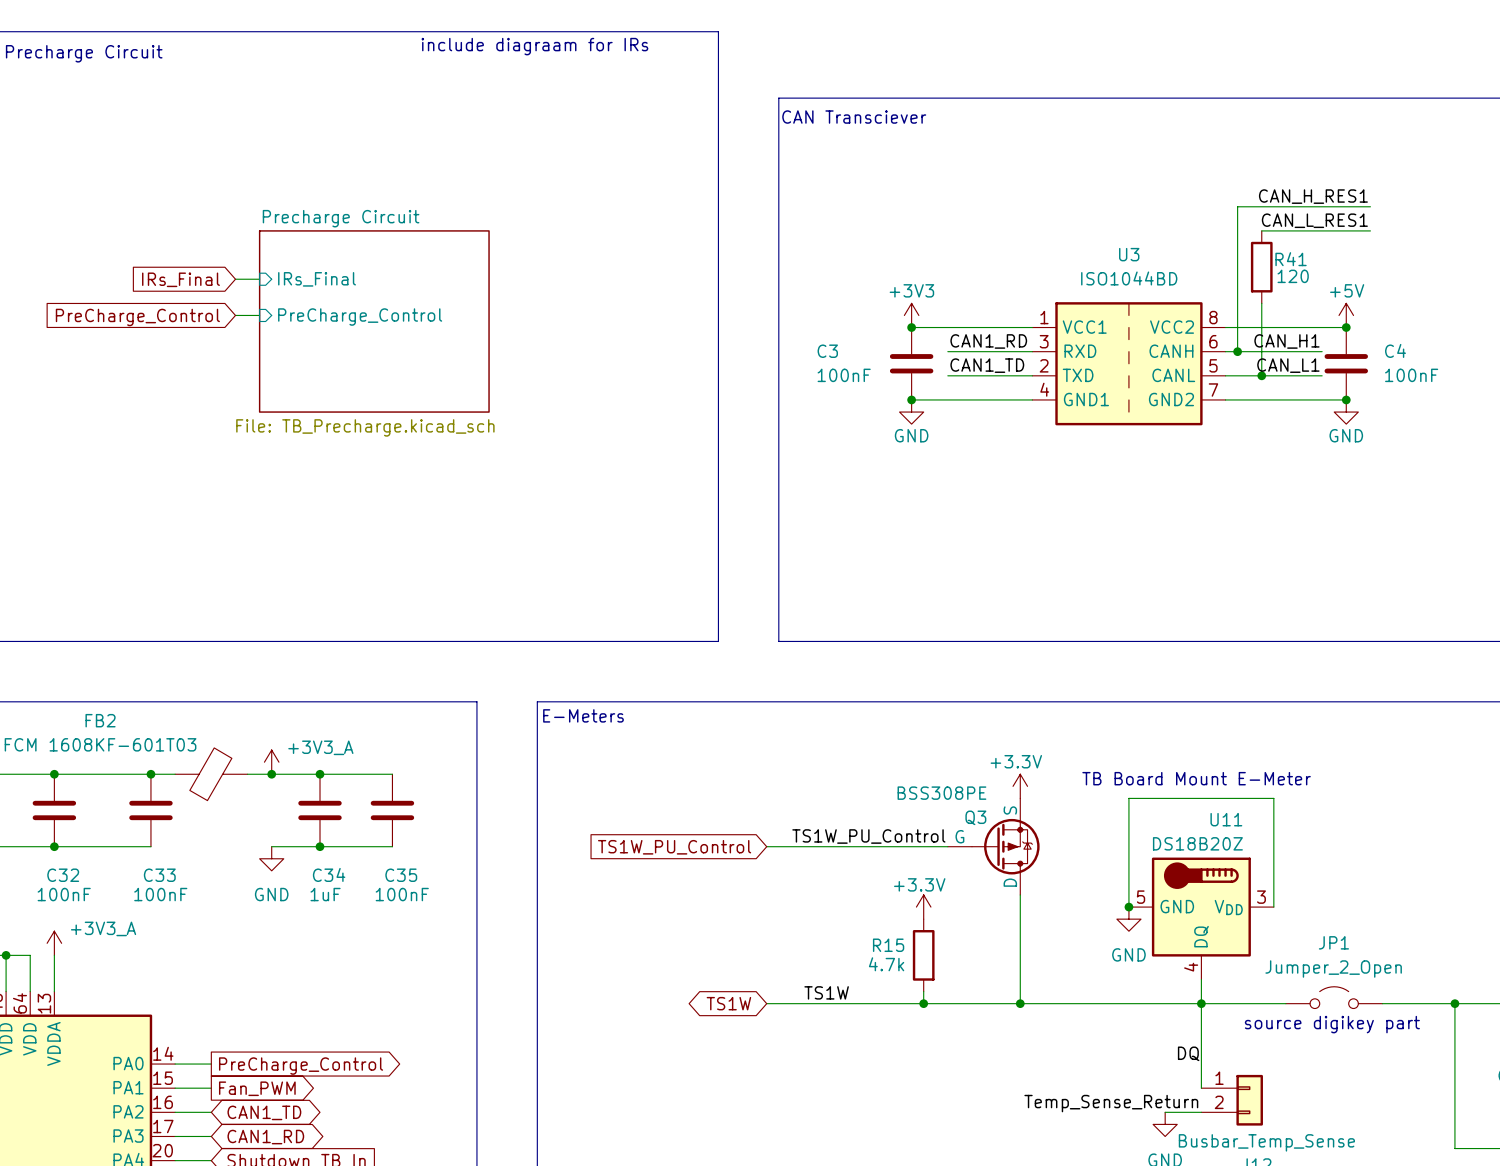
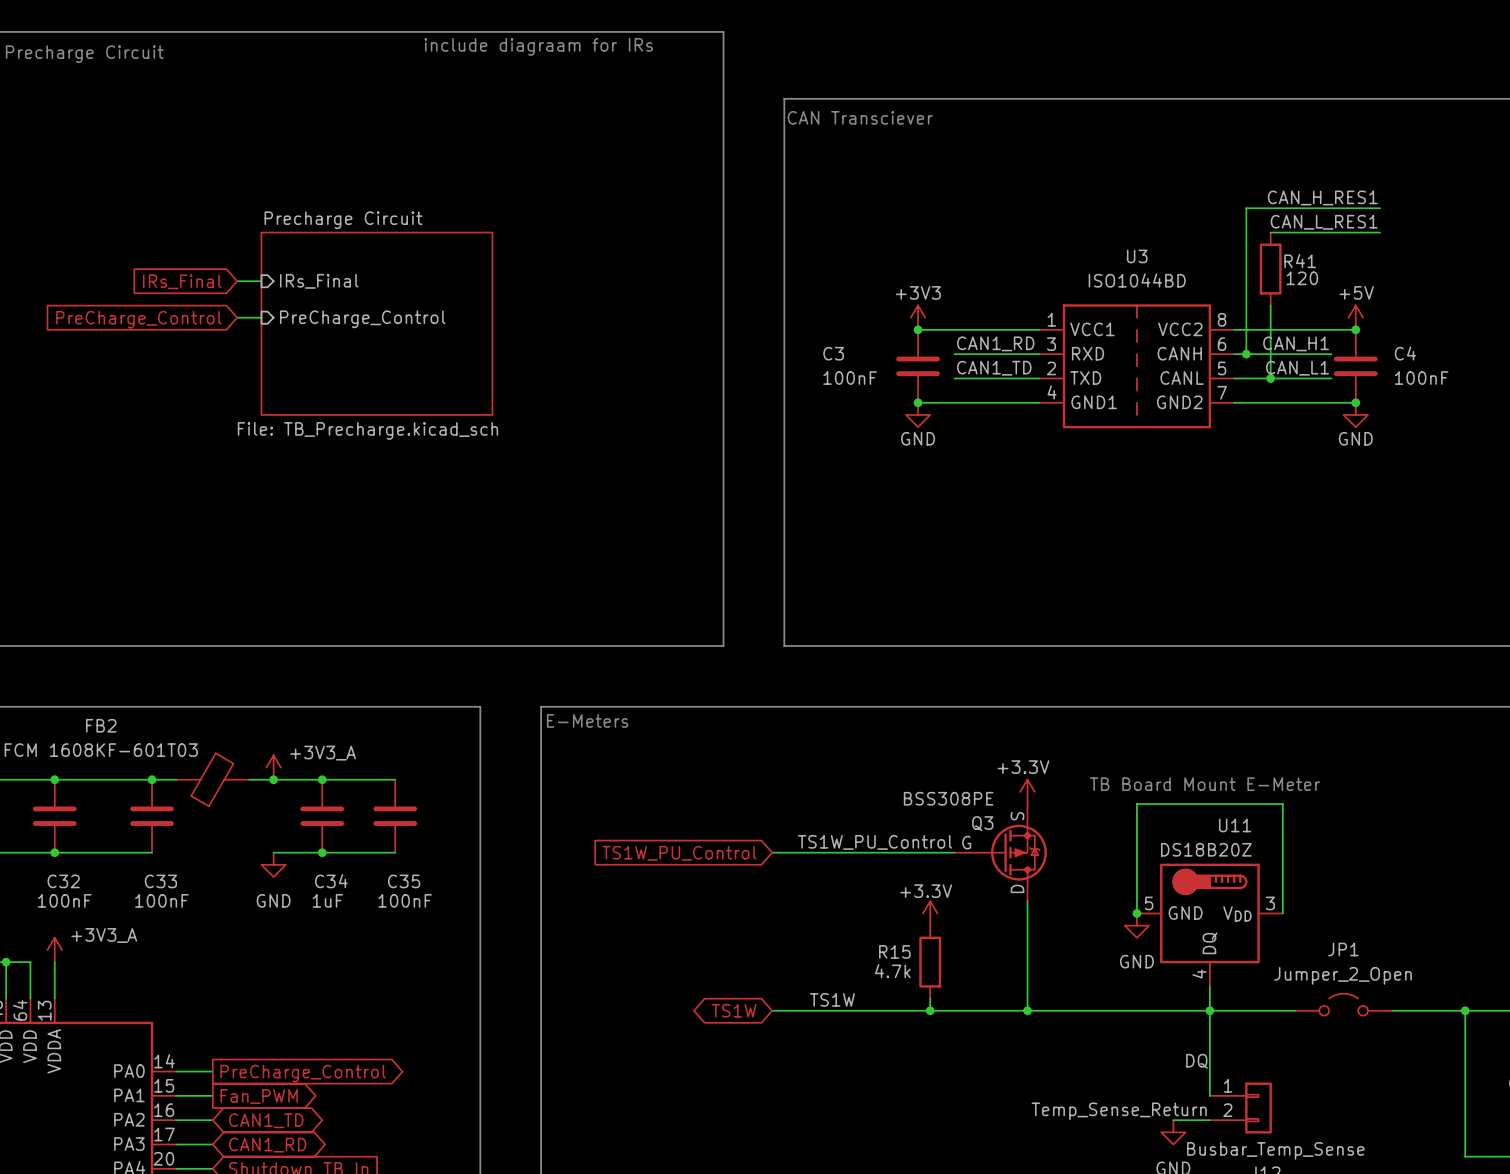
text: source digikey part (1332, 1024) -> none

